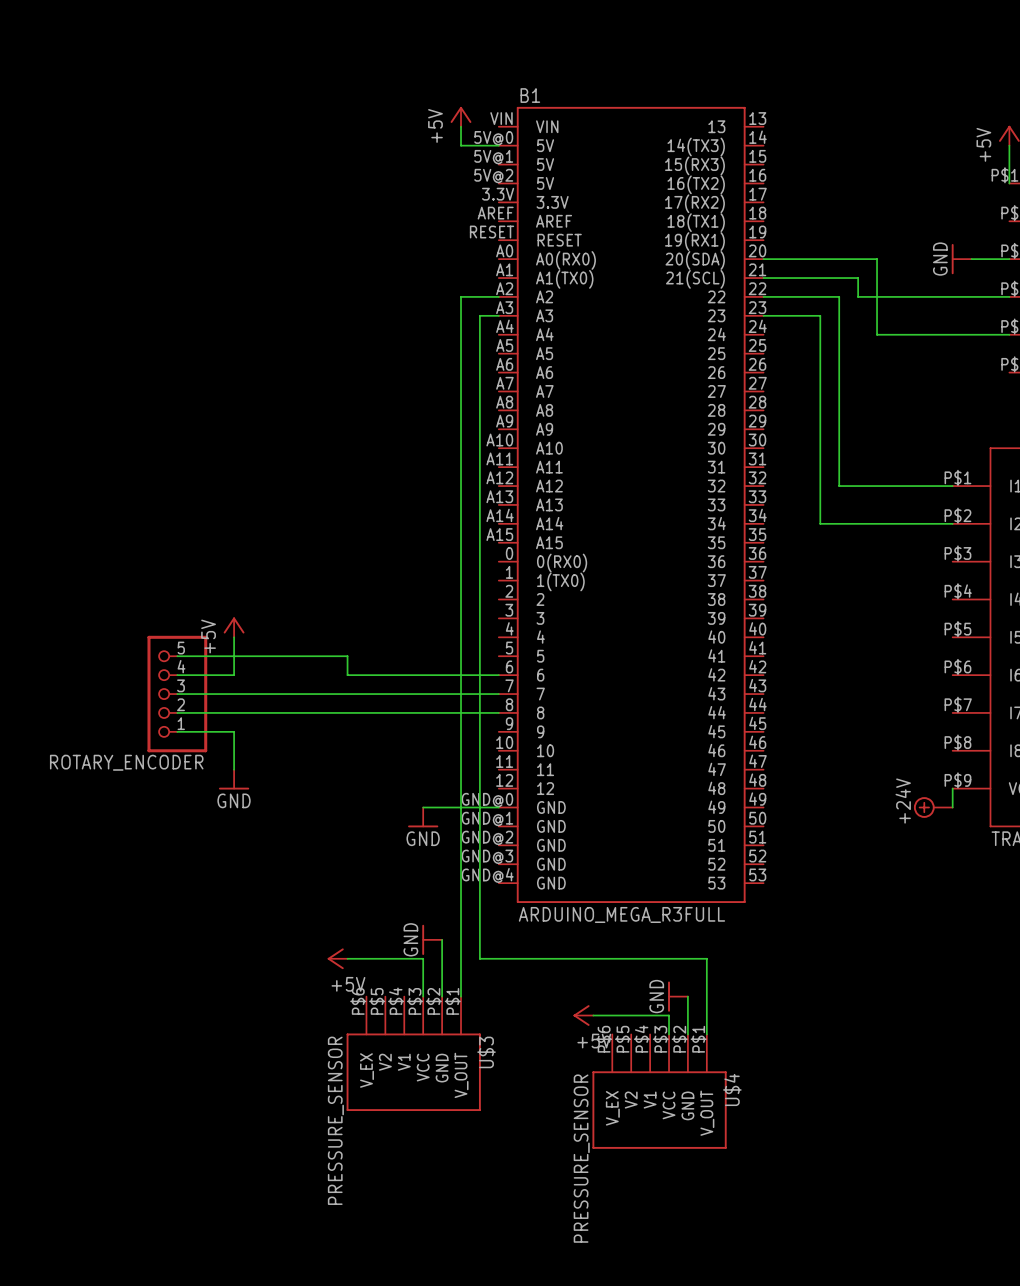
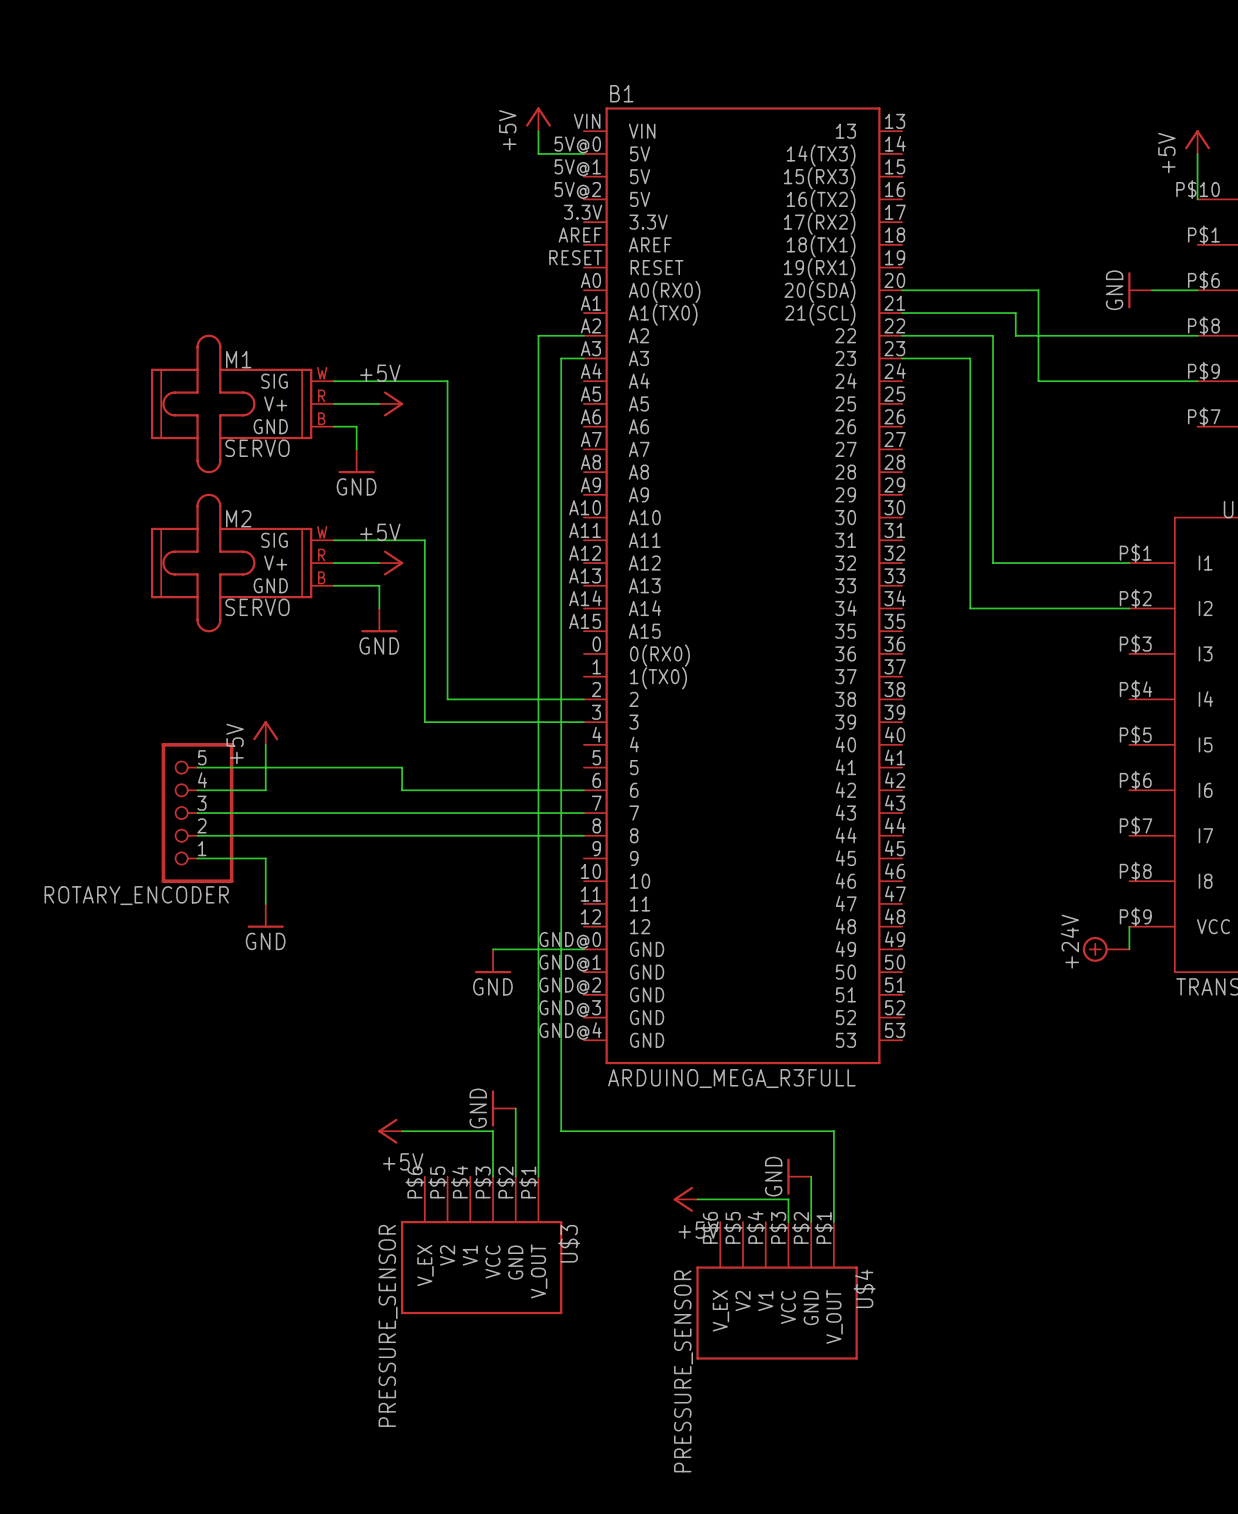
wire: none -> (333, 381) (447, 381) (447, 699) (583, 699)
M1: none -> SERVO (242, 403)
wire: none -> (333, 403) (379, 403)
power symbol: none -> +5V (391, 403)
wire: none -> (333, 426) (356, 426) (356, 449)
power symbol: none -> GND (356, 461)
wire: none -> (333, 540) (424, 540) (424, 722) (583, 722)
M2: none -> SERVO (242, 563)
wire: none -> (333, 563) (379, 563)
power symbol: none -> +5V (391, 563)
wire: none -> (333, 585) (379, 585) (379, 608)
power symbol: none -> GND (379, 620)

